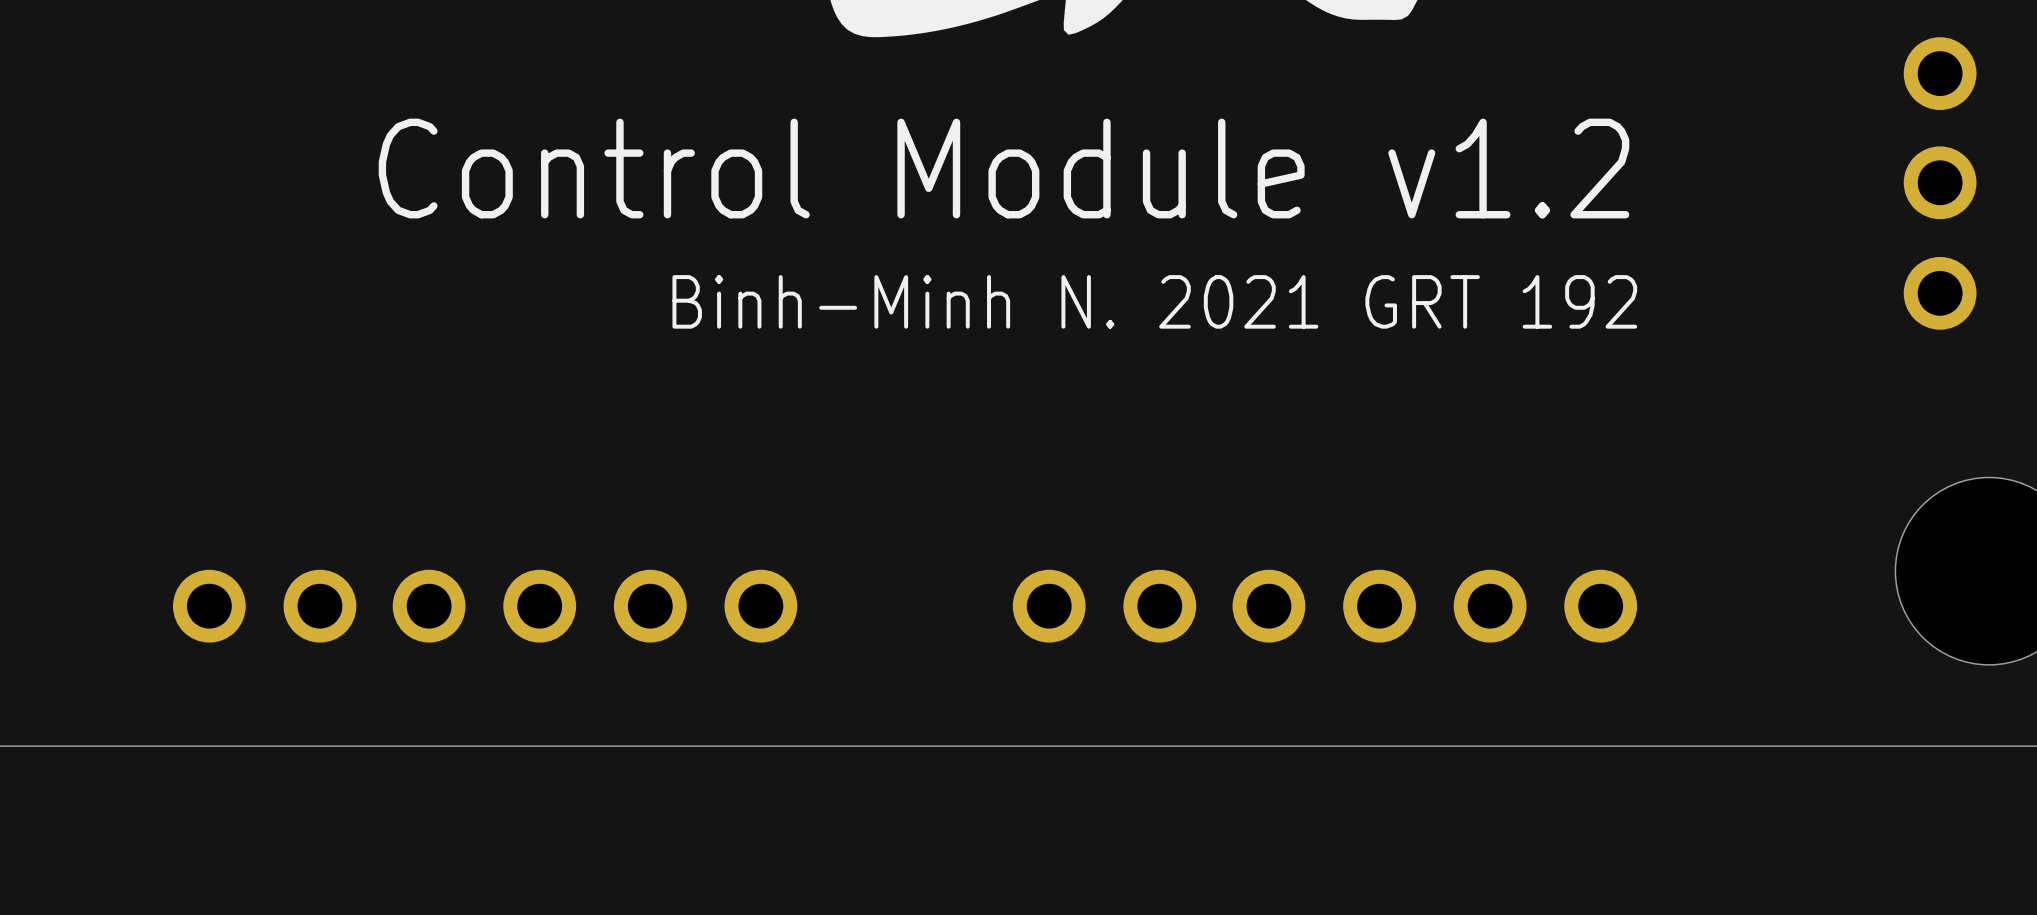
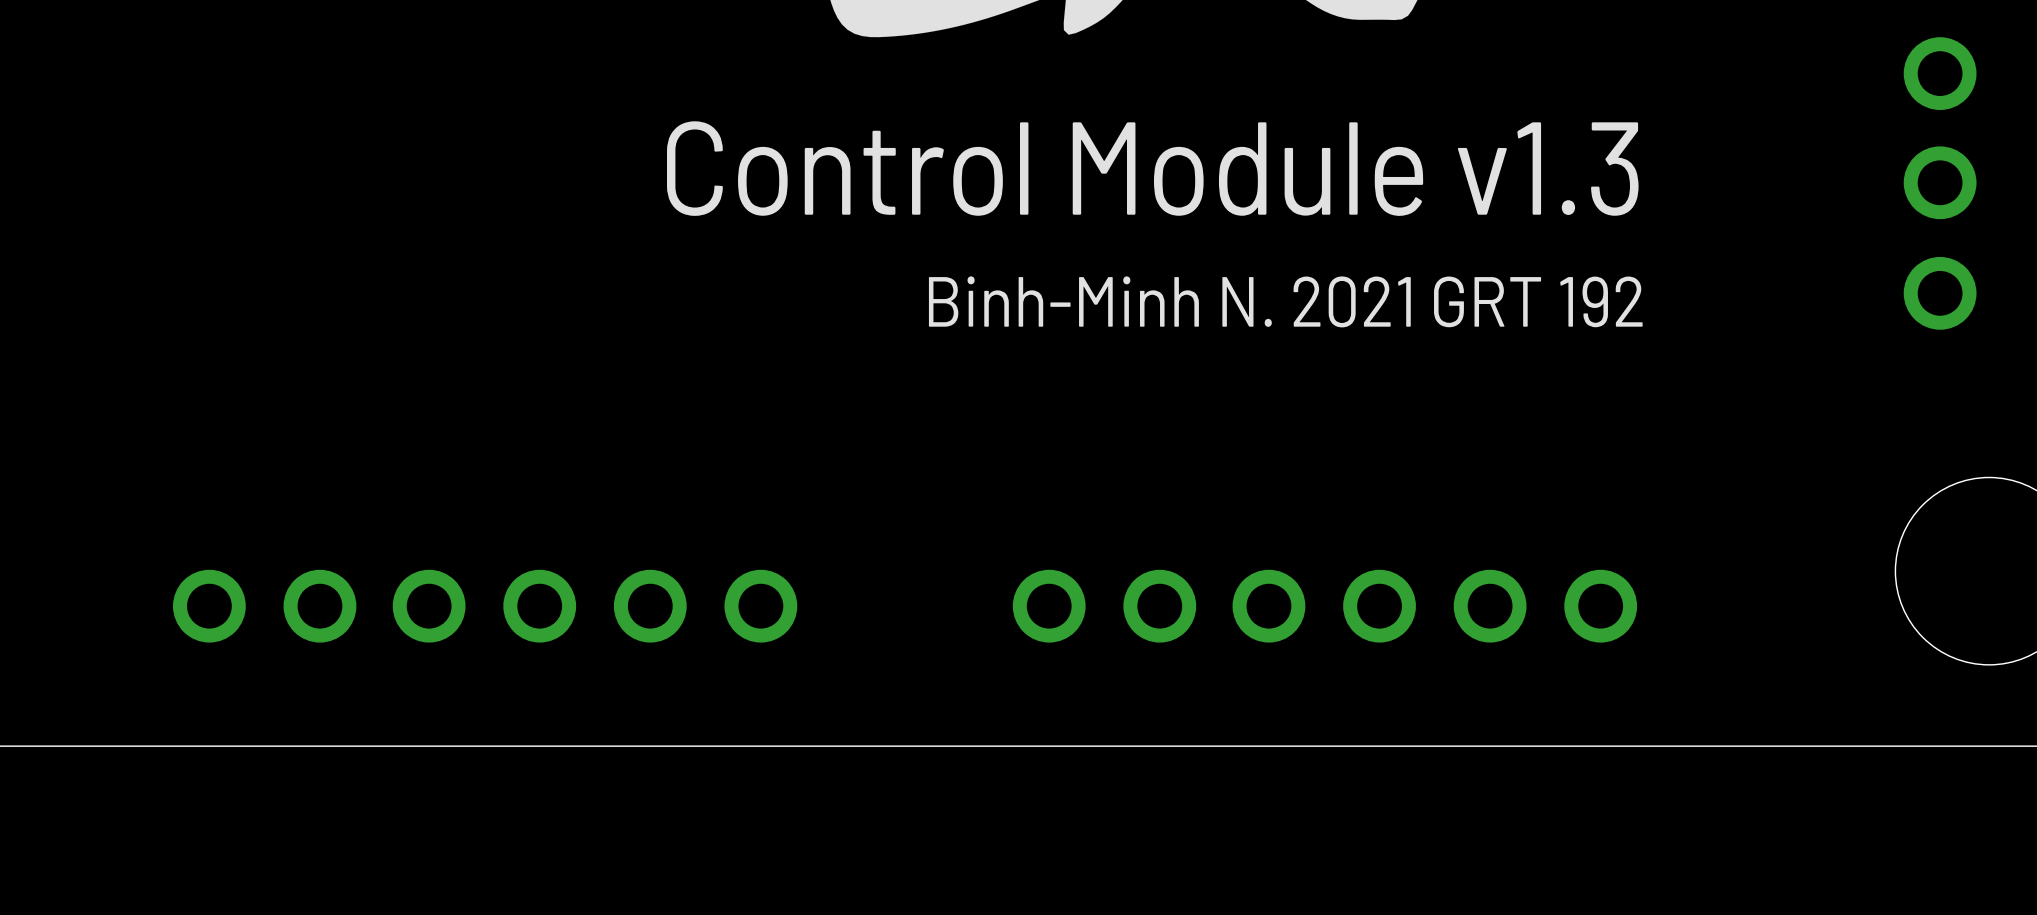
text: Control Module v1.2 (1004, 168) -> Control Module v1.3 (1152, 168)

